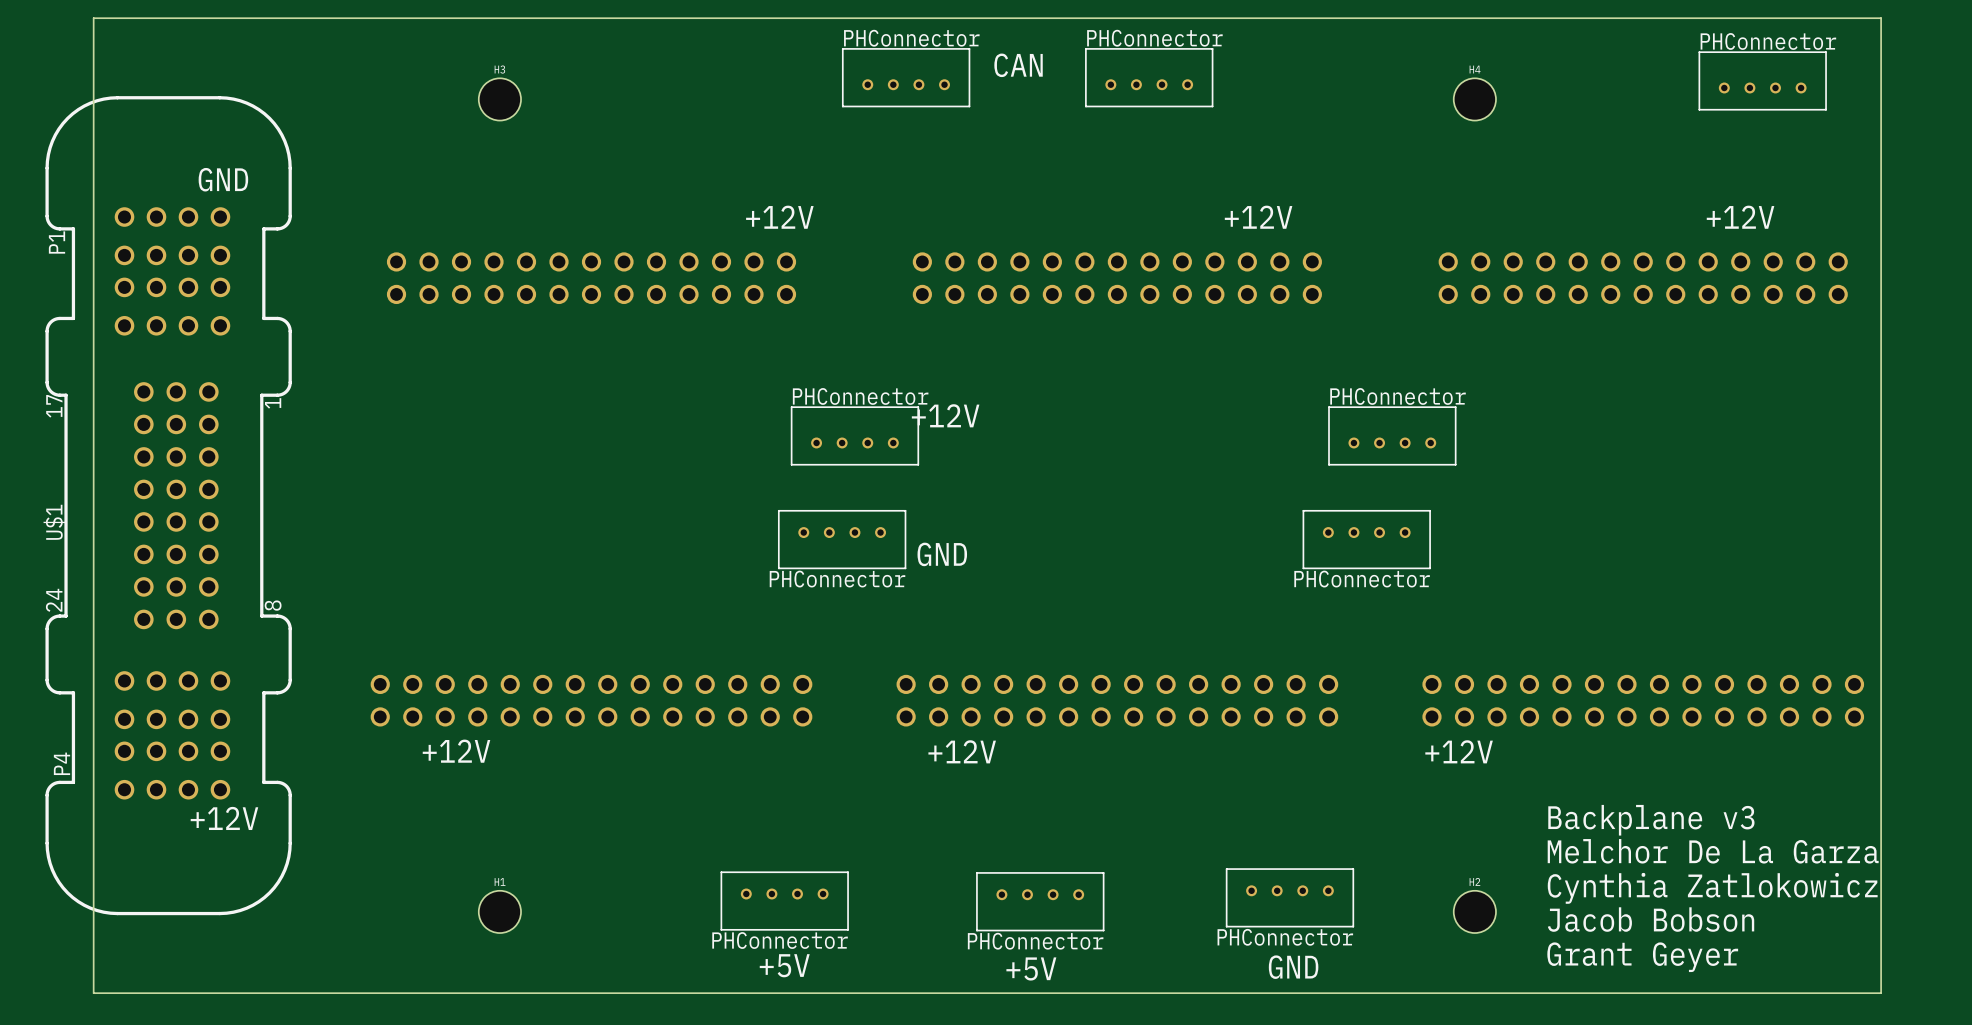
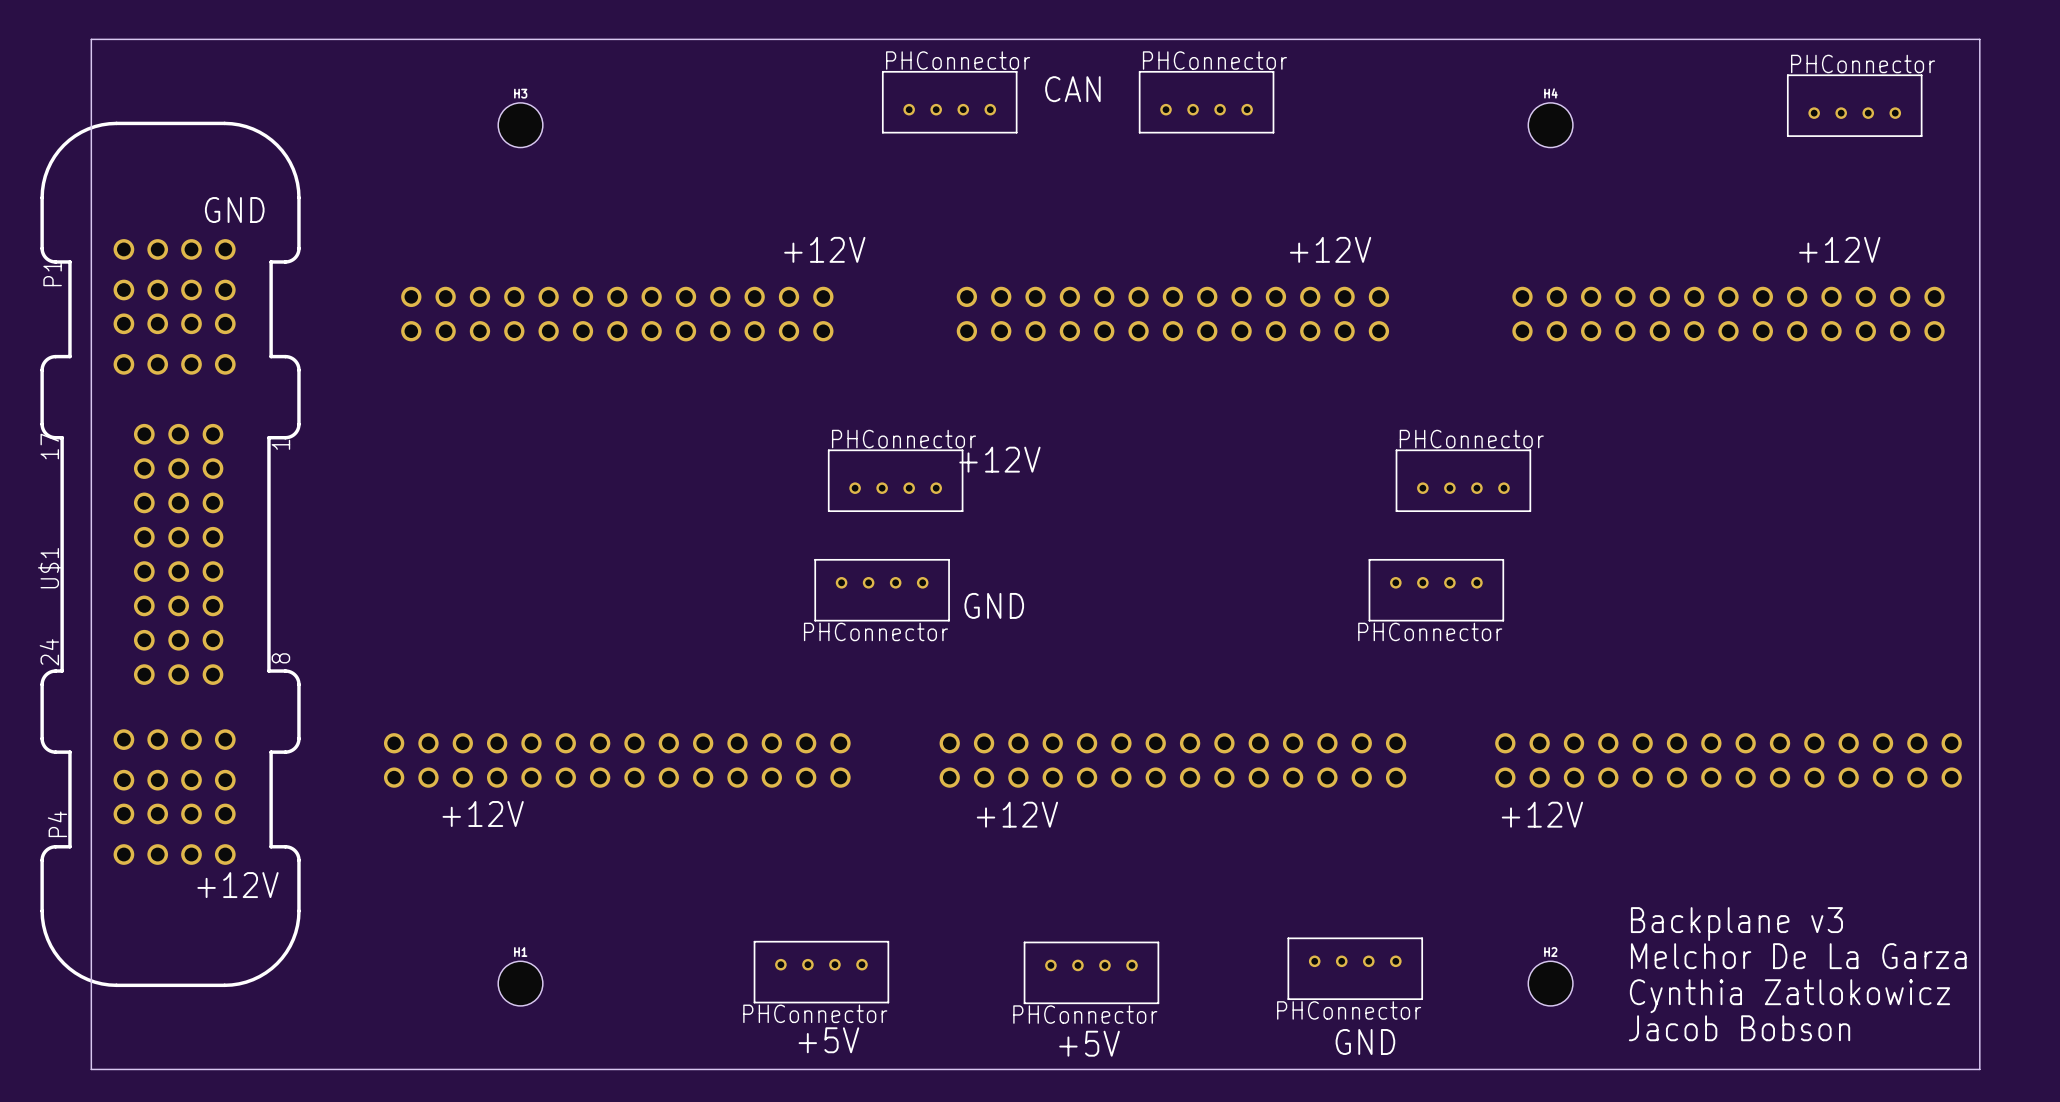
text: Backplane v3 (1651, 820) -> none
text: Melchor De La Garza (1713, 851) -> Backplane v3 (1736, 924)
text: Cynthia Zatlokowicz (1712, 888) -> Melchor De La Garza (1798, 956)
text: Jacob Bobson (1651, 919) -> Cynthia Zatlokowicz (1789, 996)
text: Grant Geyer (1642, 957) -> Jacob Bobson (1739, 1028)

